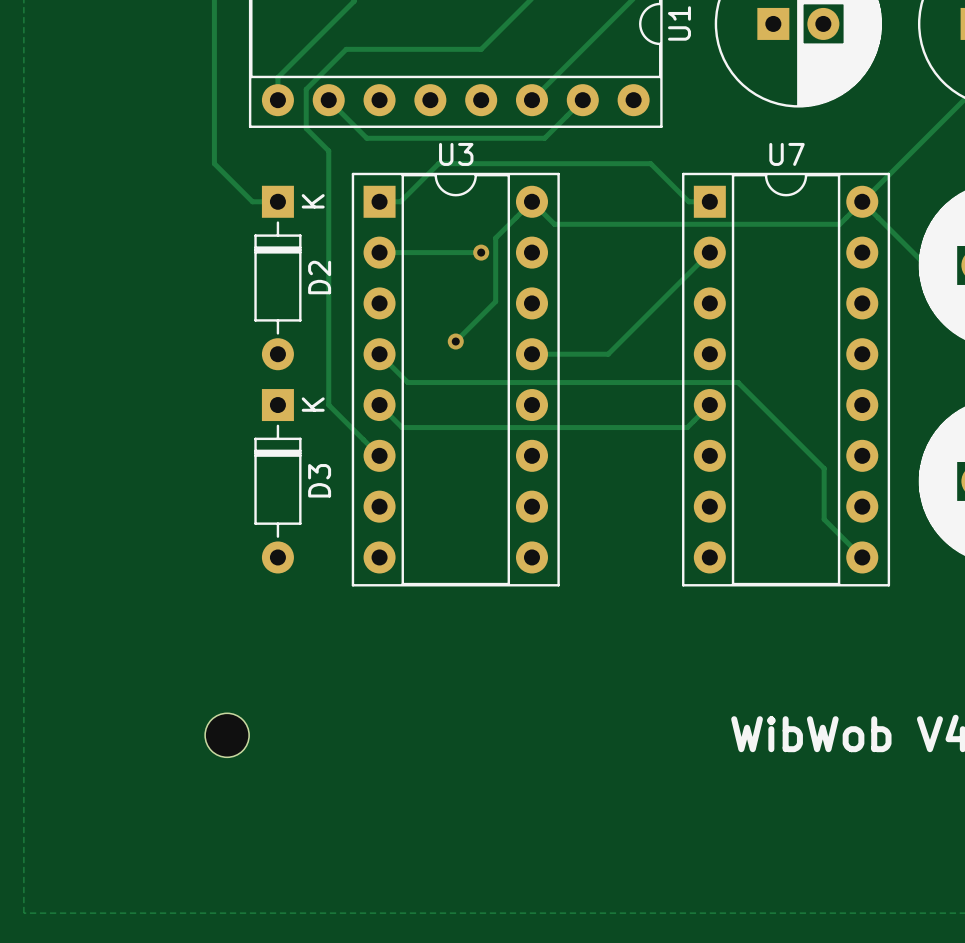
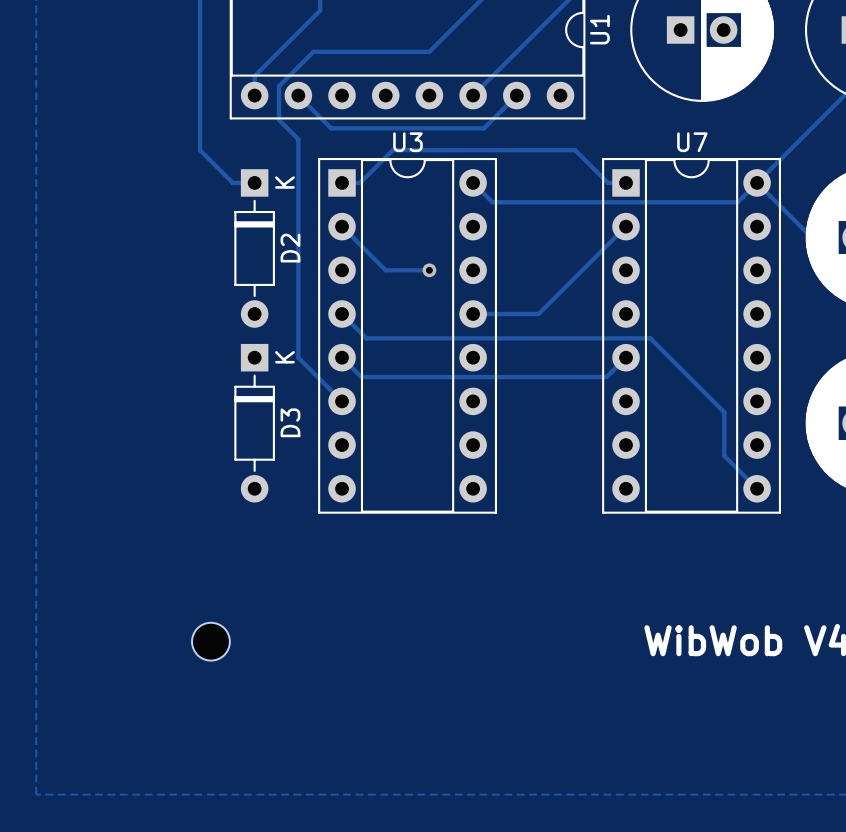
track: (531, 201) (495, 238) (495, 301) (455, 341) -> none
track: (379, 252) (481, 252) -> (342, 226) (385, 270) (429, 270)
via: (481, 252) -> none
via: none -> (429, 270)
via: (455, 341) -> none

